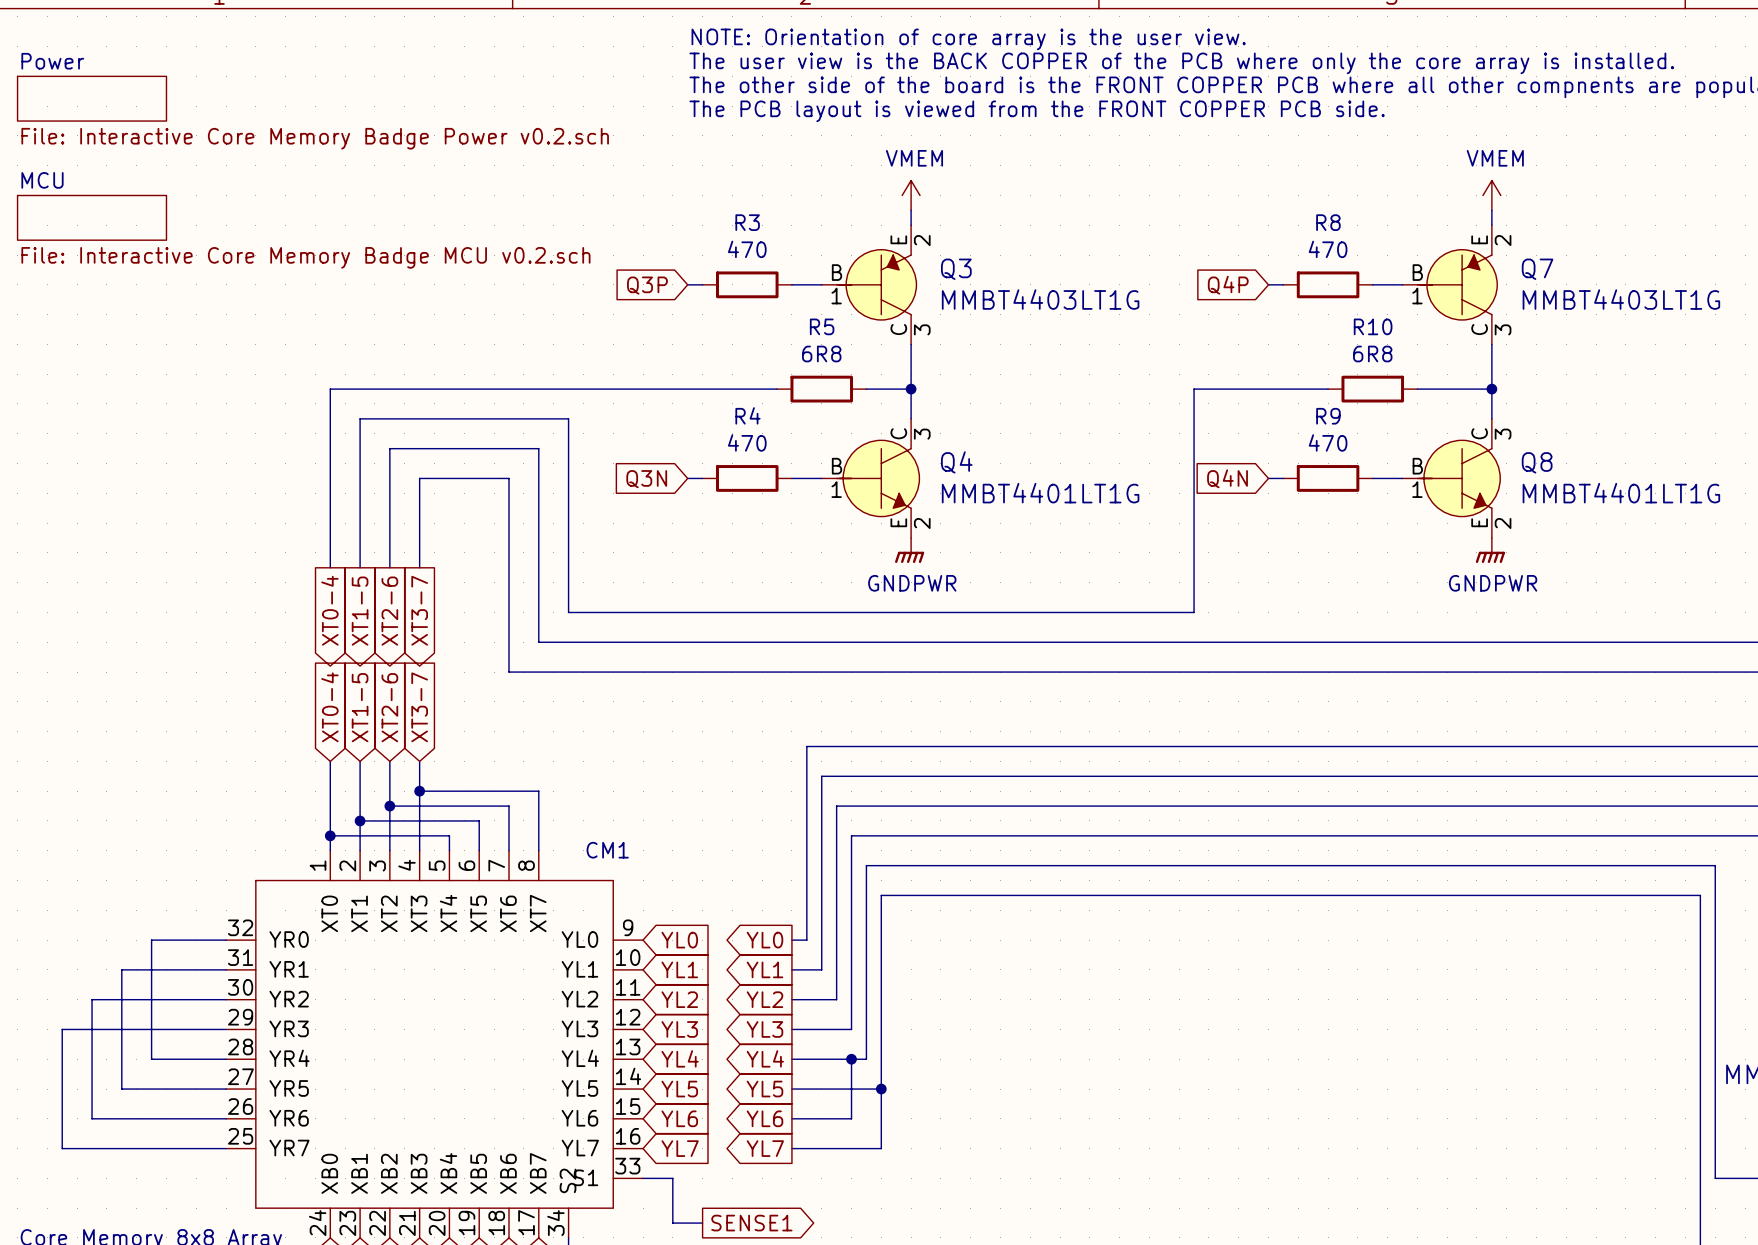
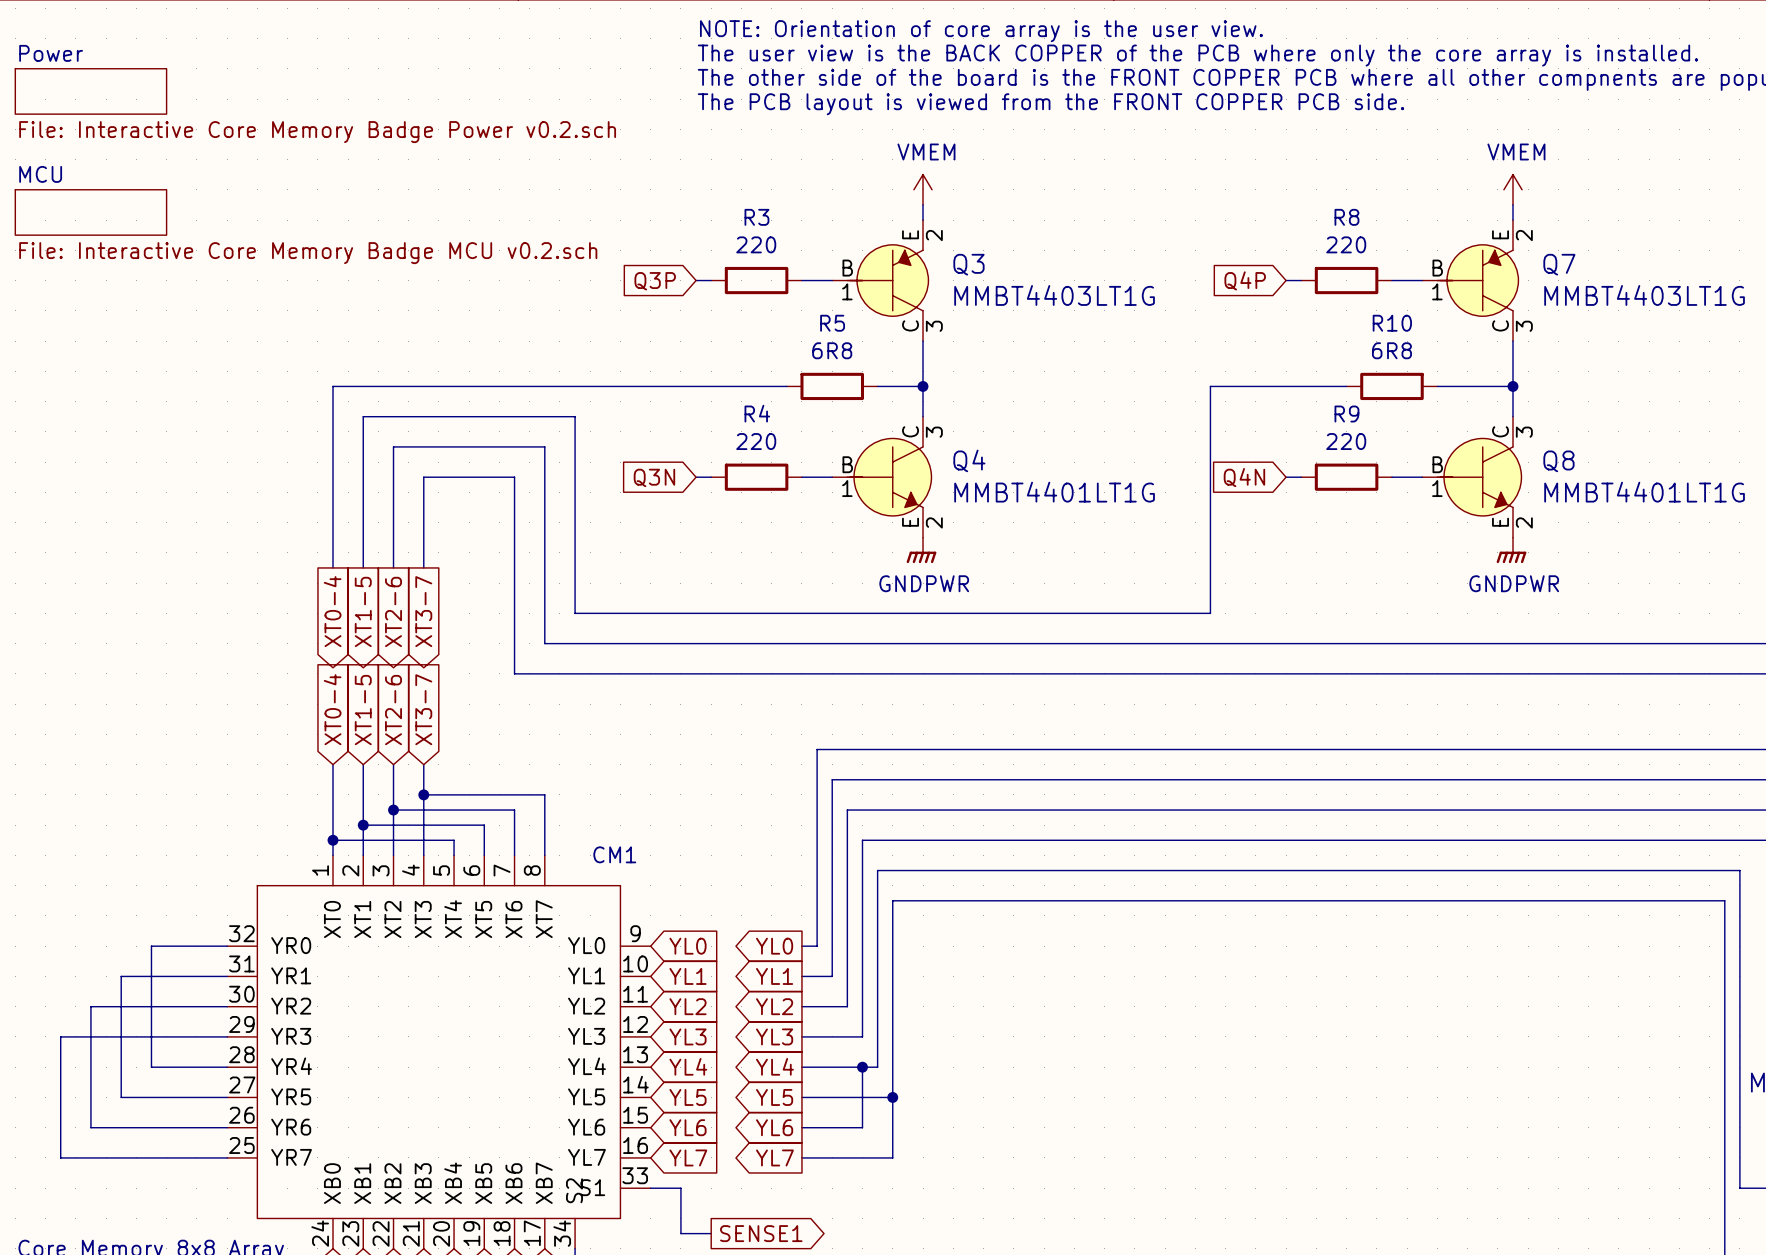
R3 value: 470 (747, 249) -> 220 (756, 244)
R8 value: 470 (1328, 249) -> 220 (1346, 244)
R4 value: 470 (747, 442) -> 220 (756, 441)
R9 value: 470 (1328, 442) -> 220 (1346, 441)

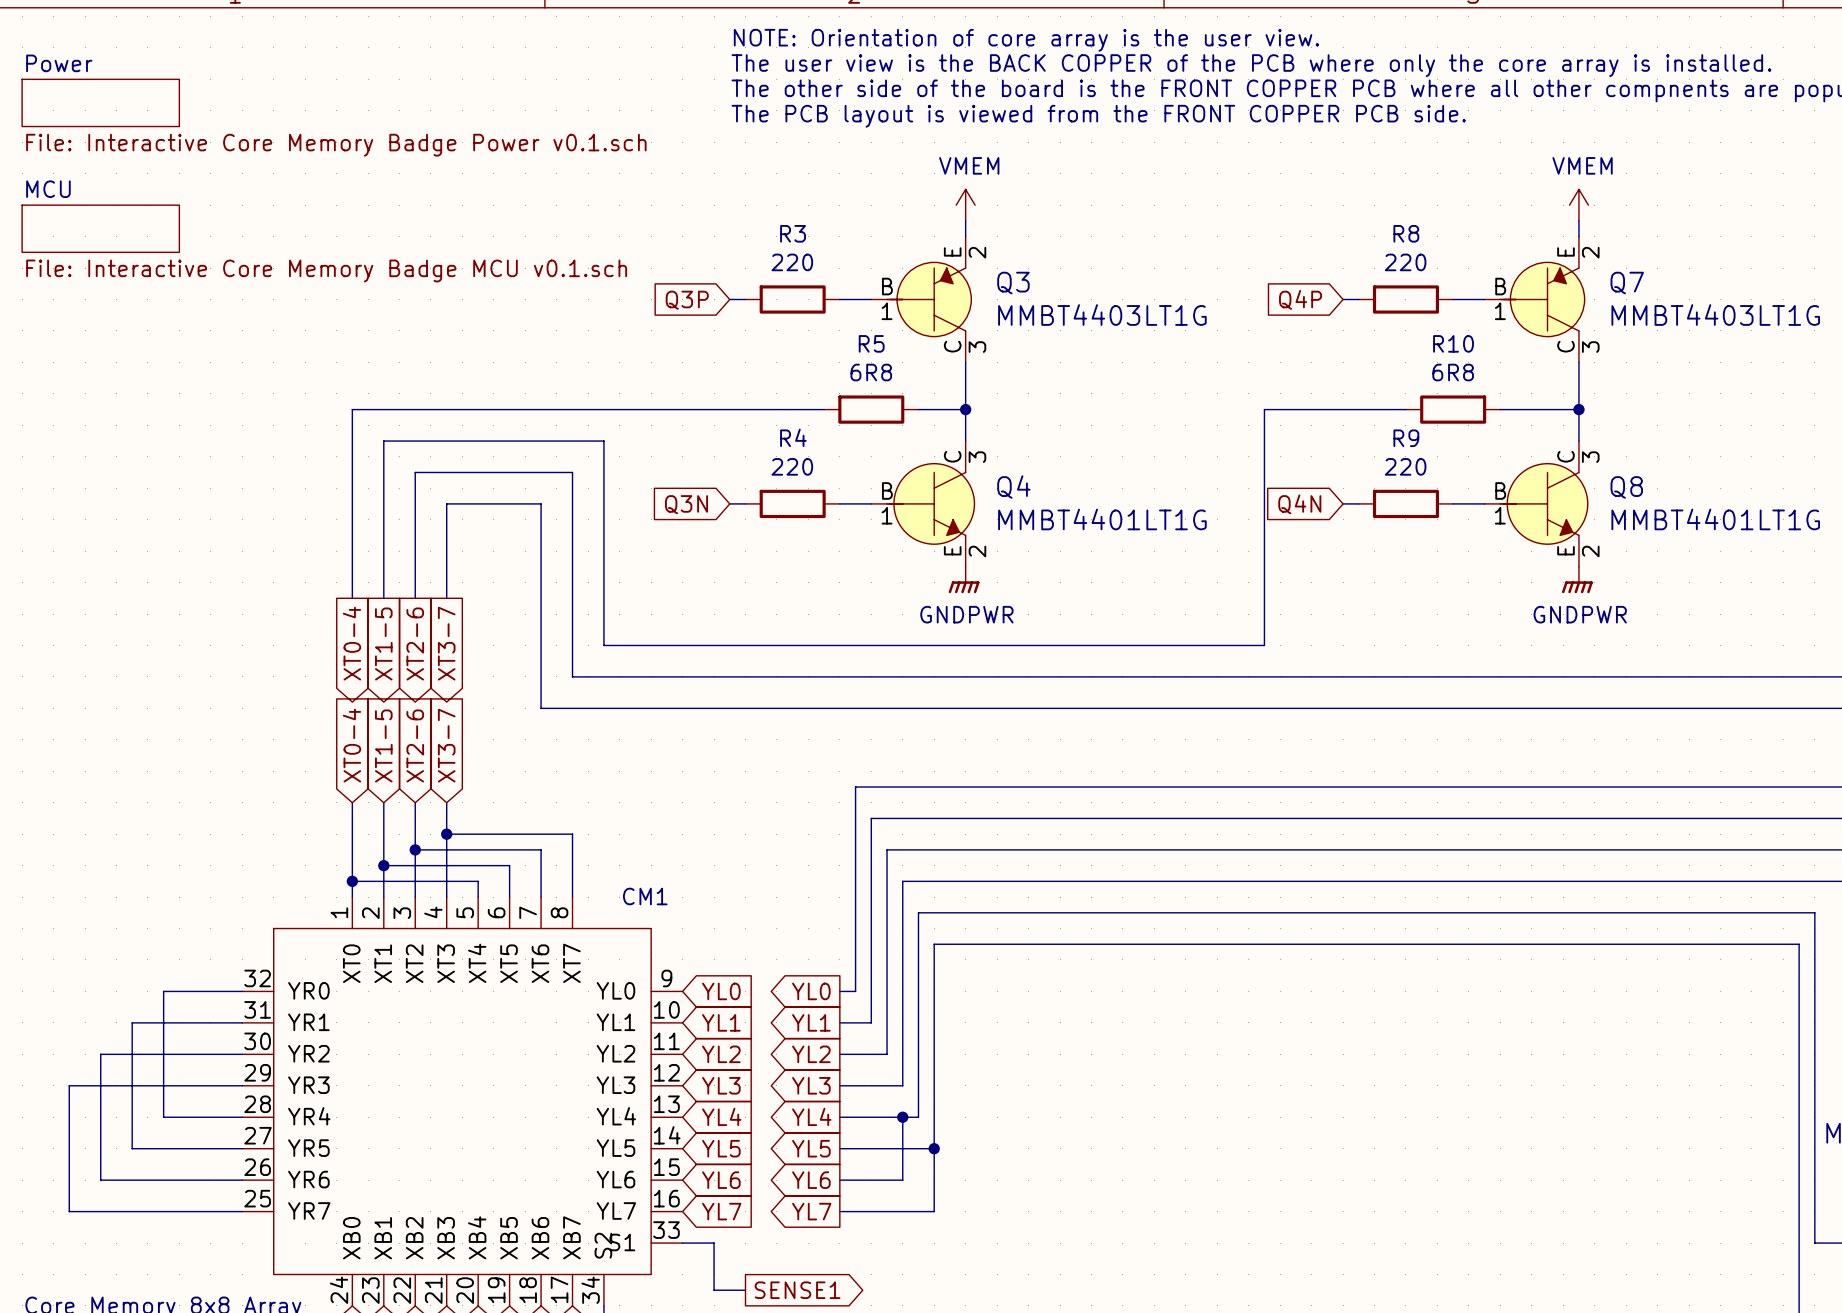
sheet Power value: File: Interactive Core Memory Badge Power v0.2.sch (317, 132) -> File: Interactive Core Memory Badge Power v0.1.sch (336, 145)
sheet MCU value: File: Interactive Core Memory Badge MCU v0.2.sch (308, 253) -> File: Interactive Core Memory Badge MCU v0.1.sch (326, 270)

